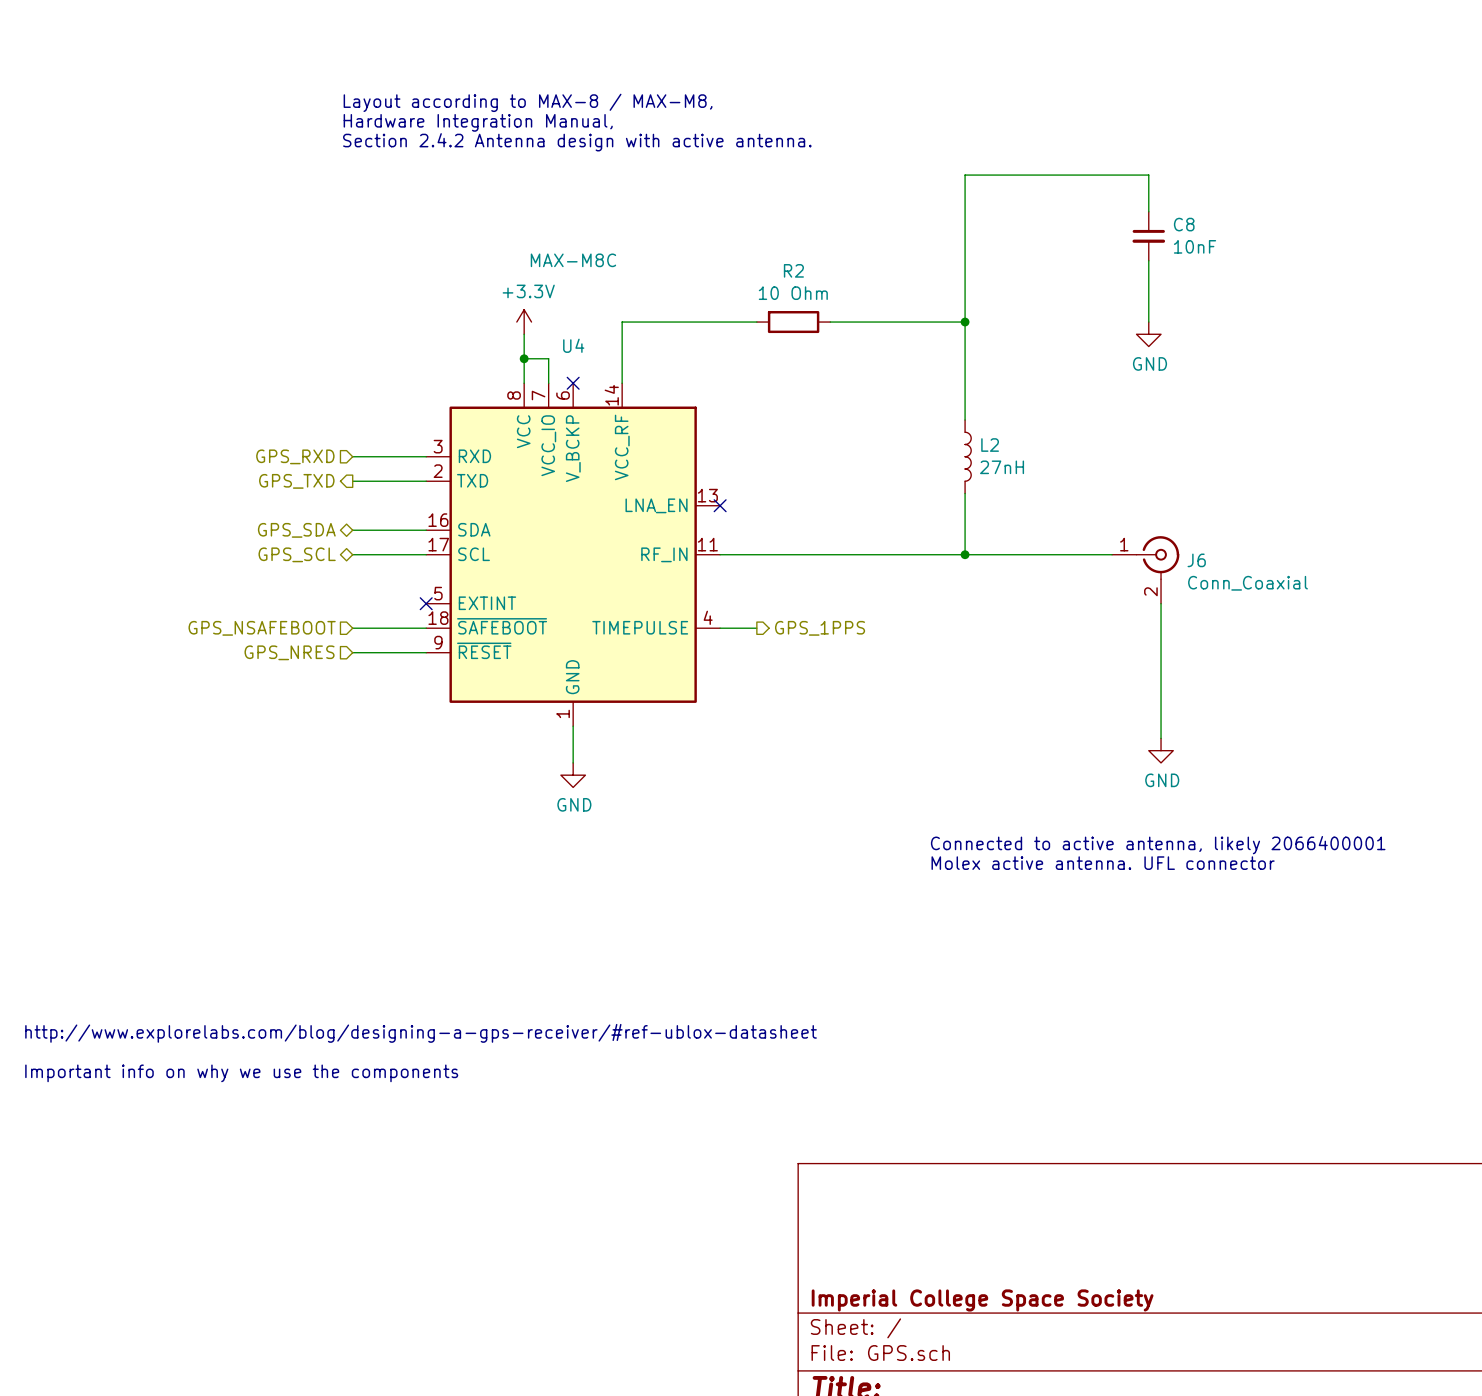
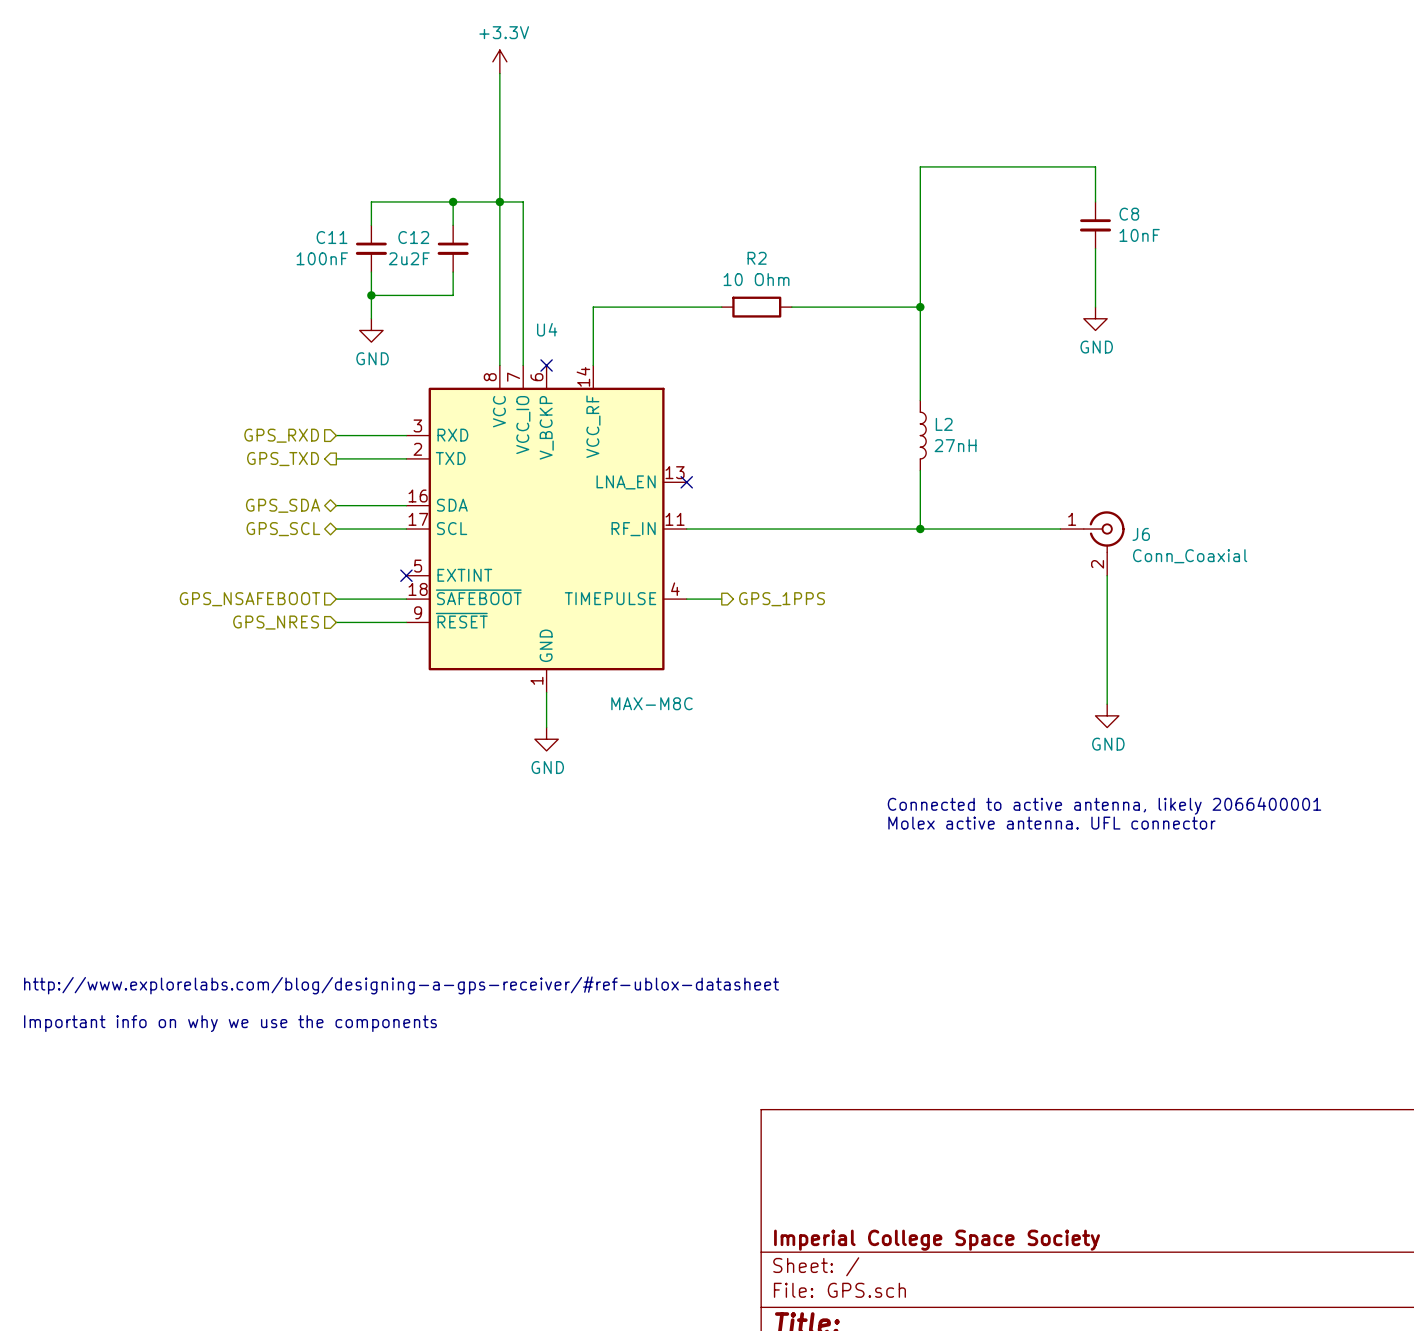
power symbol: none -> +3.3V (499, 61)
wire: none -> (499, 73) (499, 318)
text: Layout according to MAX-8 / MAX-M8, (528, 102) -> none
text: Hardware Integration Manual, (478, 122) -> none
text: Section 2.4.2 Antenna design with active antenna. (577, 142) -> none
wire: none -> (453, 201) (453, 225)
junction: none -> (453, 201)
junction: none -> (499, 201)
C11: none -> 100nF (371, 248)
C12: none -> 2u2F (453, 248)
U4 value position: MAX-M8C (573, 260) -> MAX-M8C (651, 703)
wire: none -> (371, 272) (371, 318)
wire: none -> (453, 272) (453, 295) (371, 295)
junction: none -> (371, 295)
power symbol: +3.3V (524, 322) -> none
power symbol: none -> GND (371, 330)
wire: (524, 358) (548, 358) -> (371, 225) (371, 201) (523, 201) (523, 342)
junction: (524, 358) -> none

